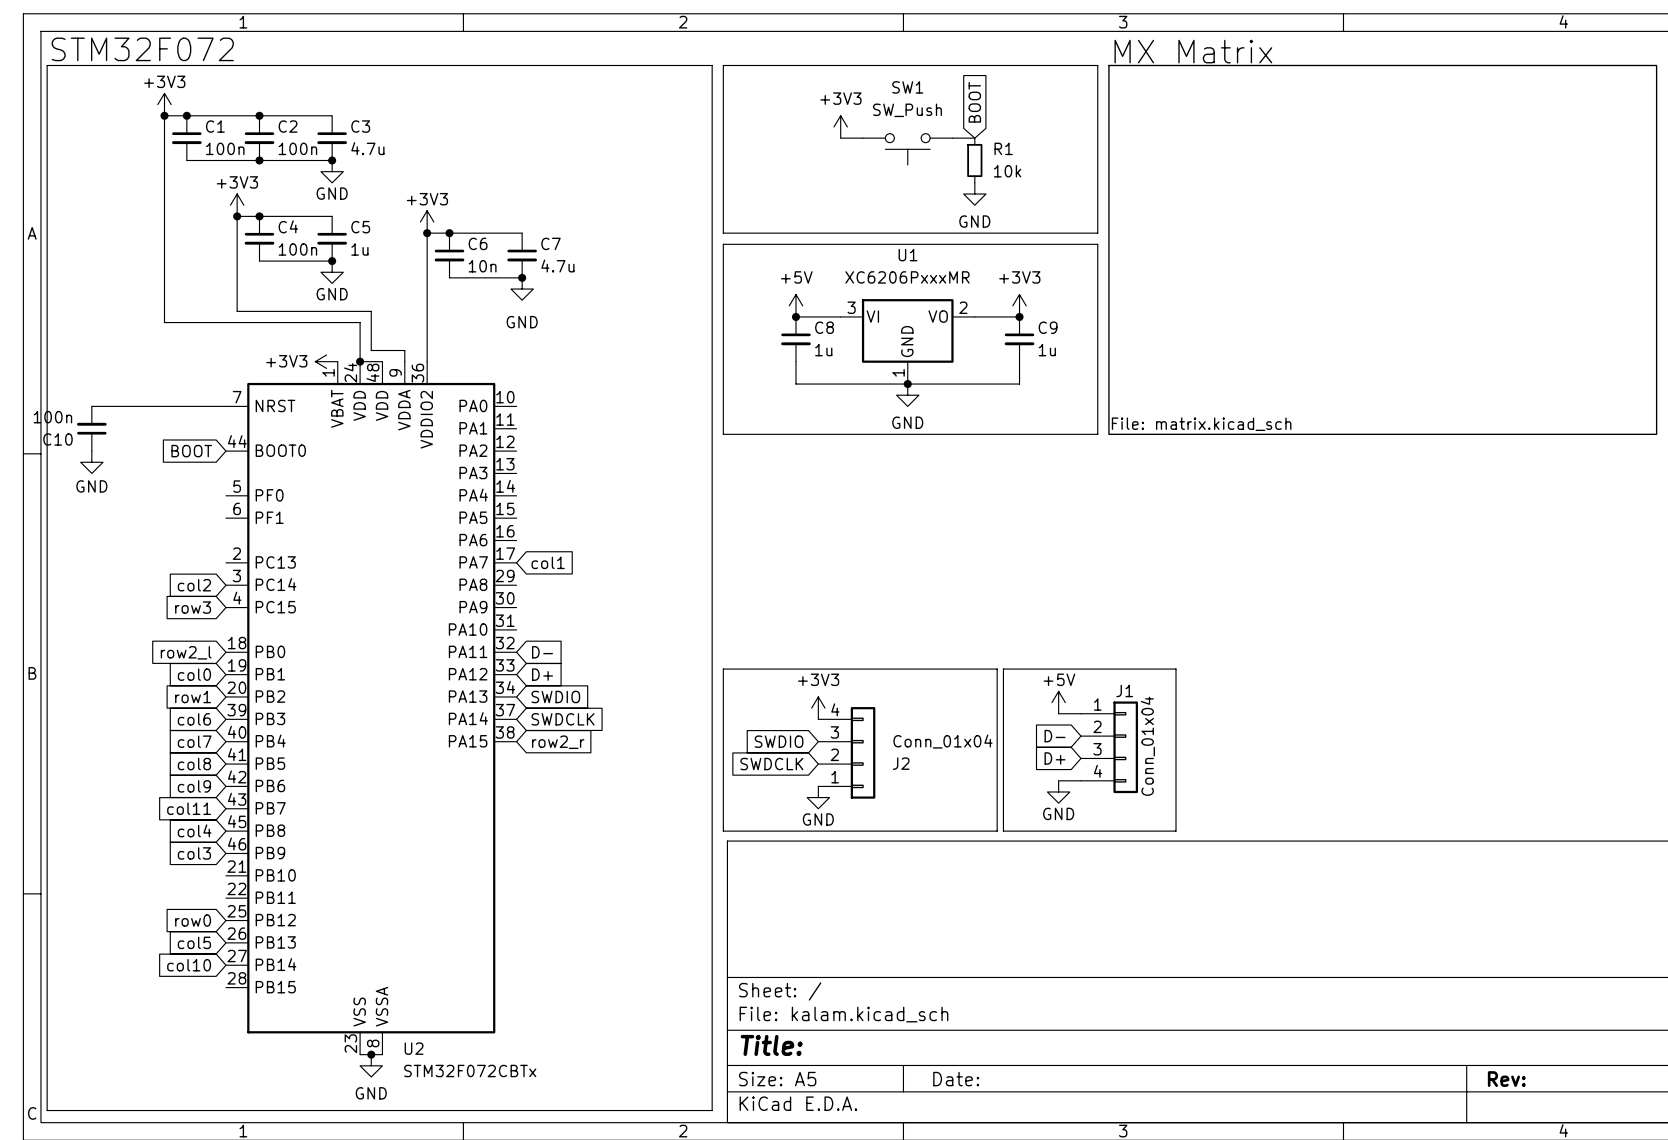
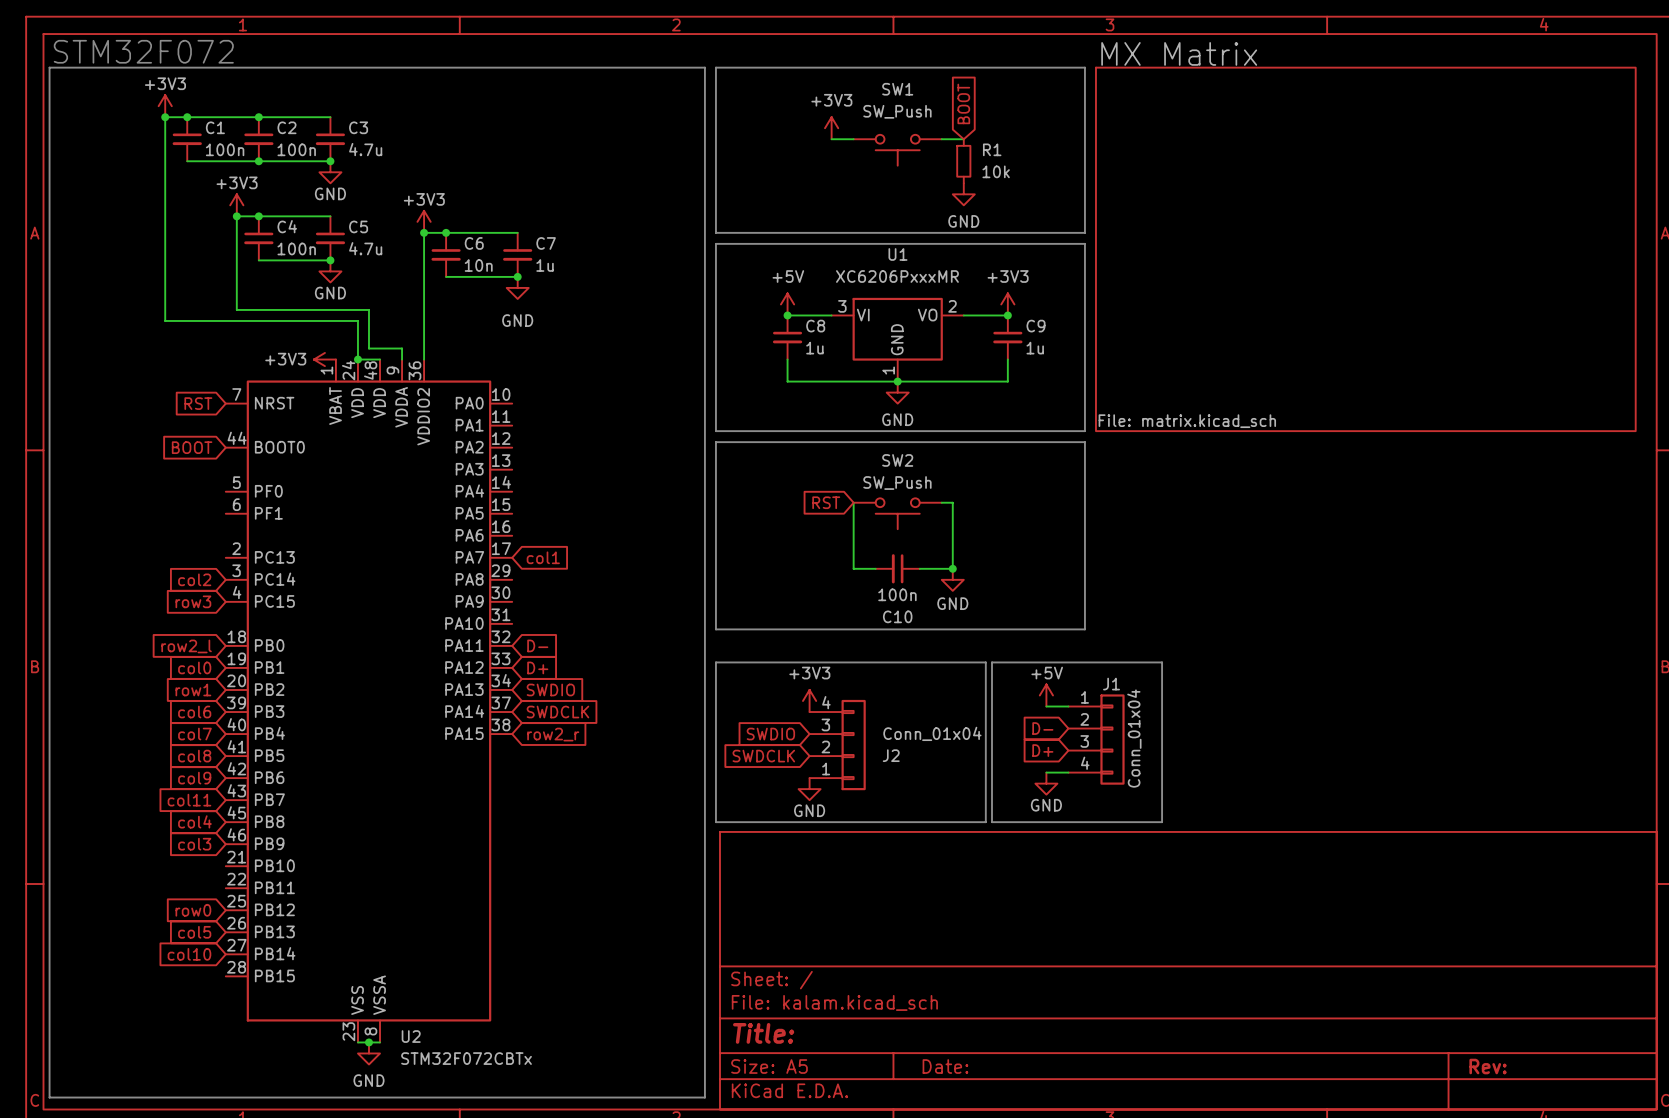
C5 value: 1u (359, 249) -> 4.7u (365, 248)
C7 value: 4.7u (557, 265) -> 1u (545, 265)
wire: (91, 406) (225, 406) -> none
global label: none -> RST (198, 403)
C10 value position: 100n (52, 417) -> 100n (897, 594)
C10 rotation: 0° (91, 428) -> 90° counterclockwise (897, 568)
C10 position: (91, 428) -> (897, 568)
line: none -> (715, 442) (1084, 442) (1084, 629) (715, 629) (715, 442)
power symbol: GND (91, 462) -> none
global label: none -> RST (826, 502)
wire: none -> (853, 502) (853, 568) (875, 568)
wire: none -> (941, 502) (952, 502) (952, 568) (919, 568)
SW2: none -> SW_Push (897, 513)
junction: none -> (952, 568)
power symbol: none -> GND (952, 579)

